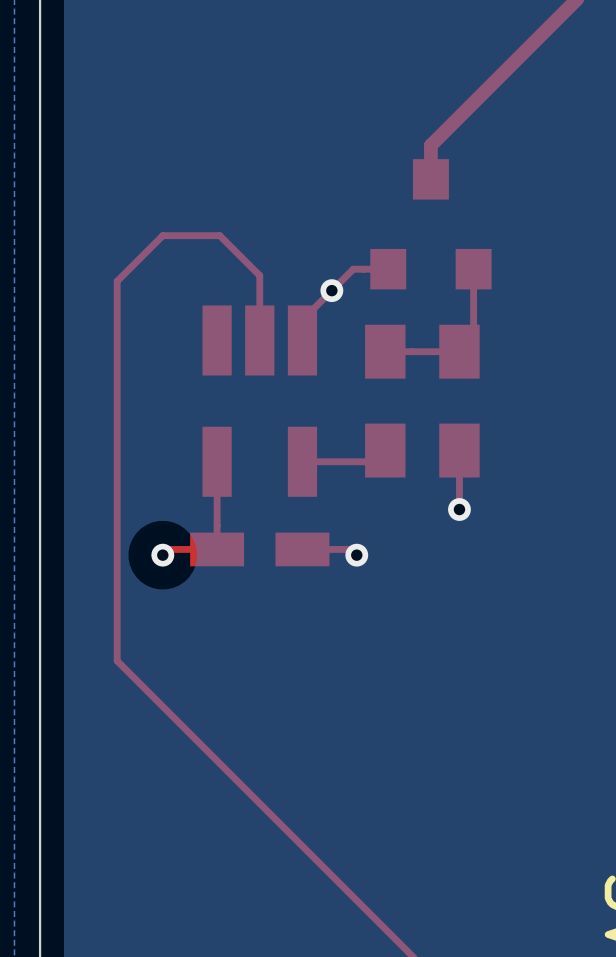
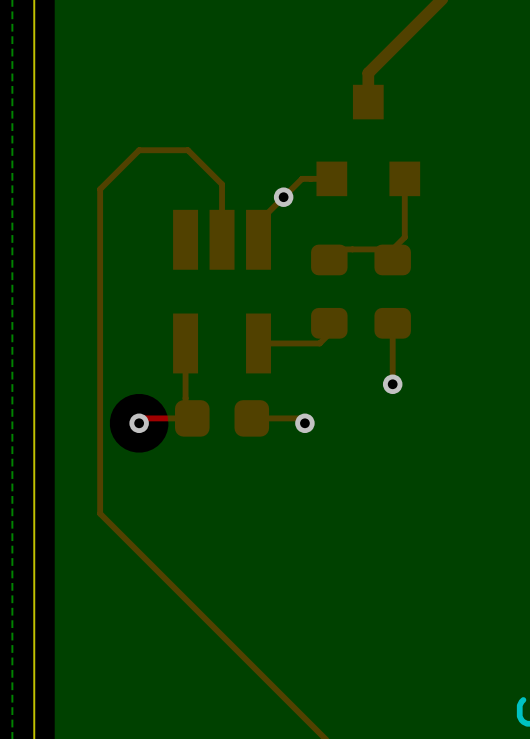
part footprint: [365, 324, 406, 478] -> [311, 244, 348, 339]
part footprint: [439, 324, 480, 478] -> [374, 244, 411, 339]
part footprint: [190, 532, 330, 567] -> [175, 400, 270, 437]

